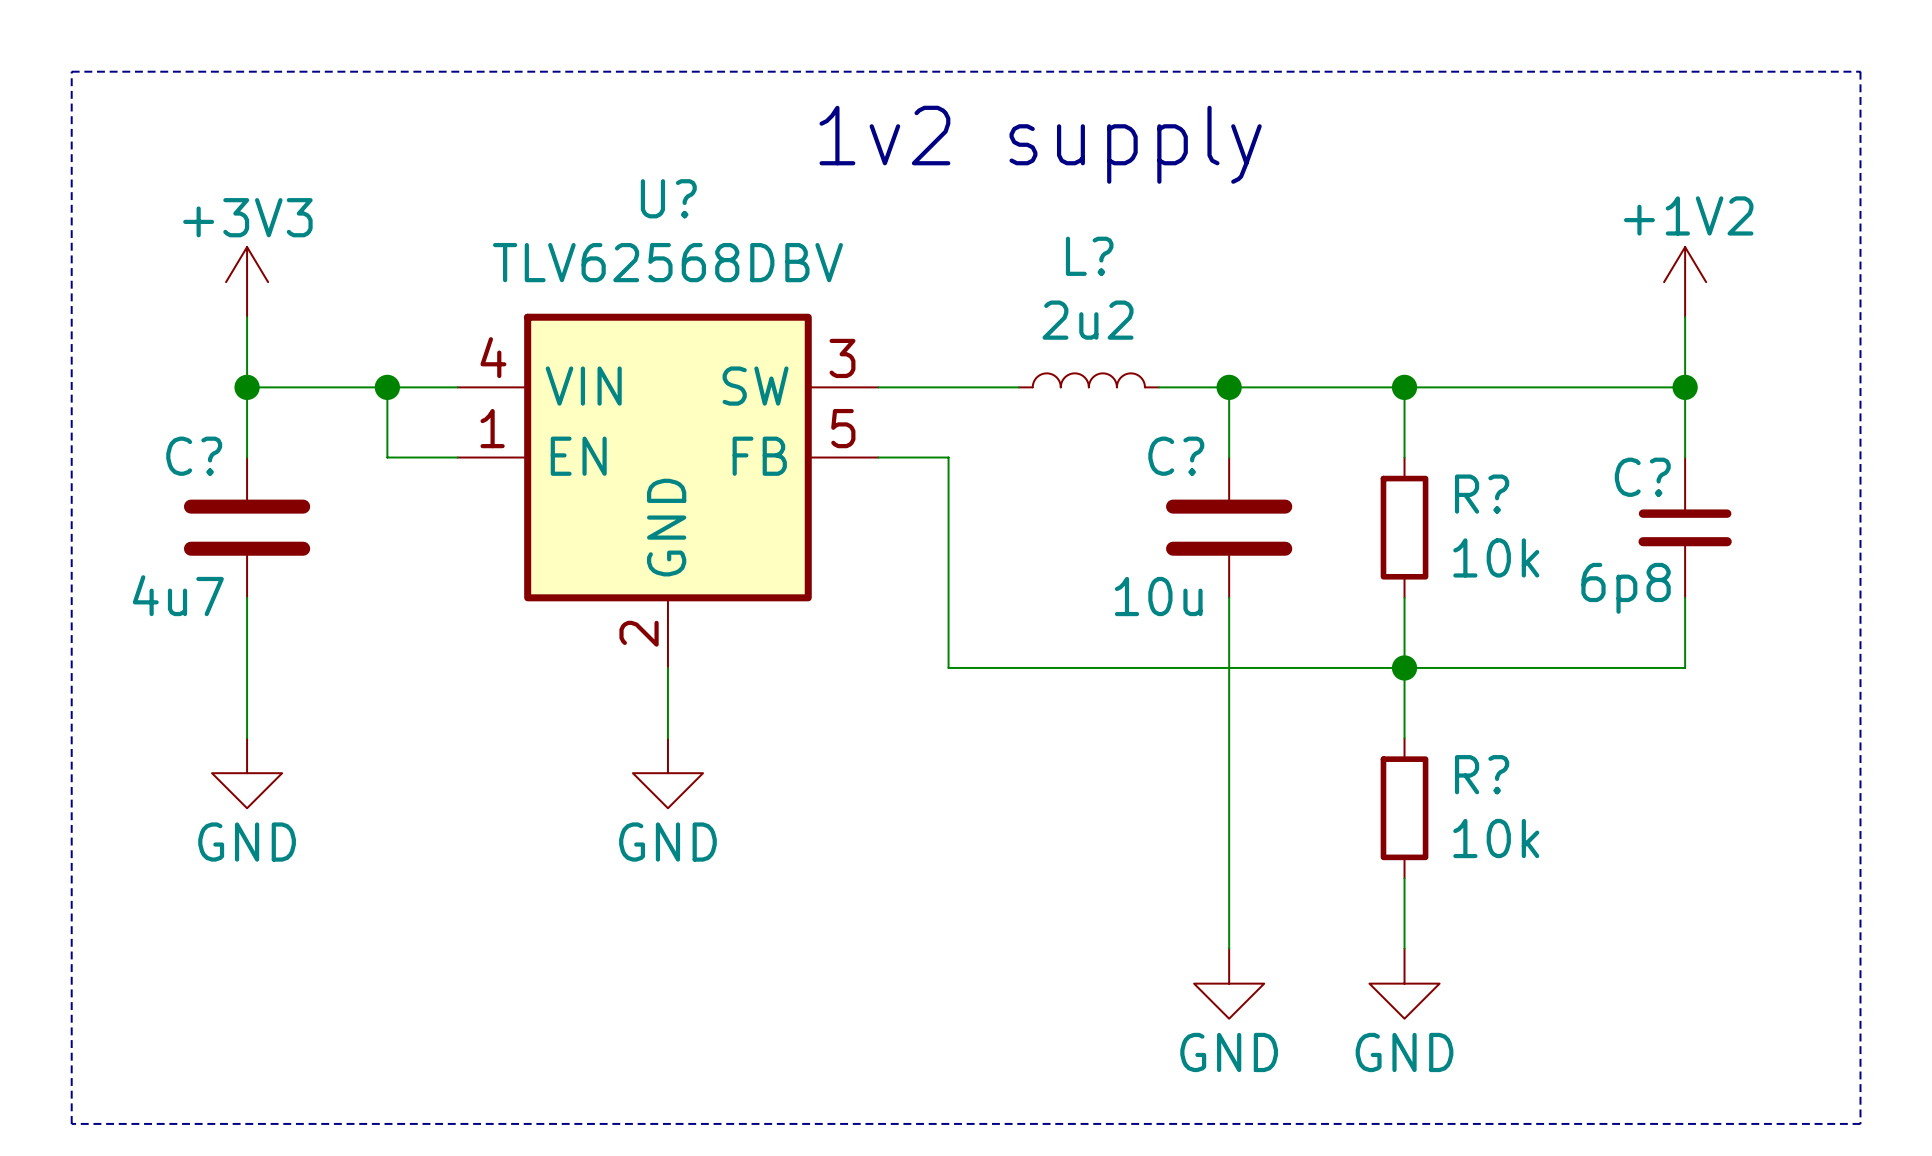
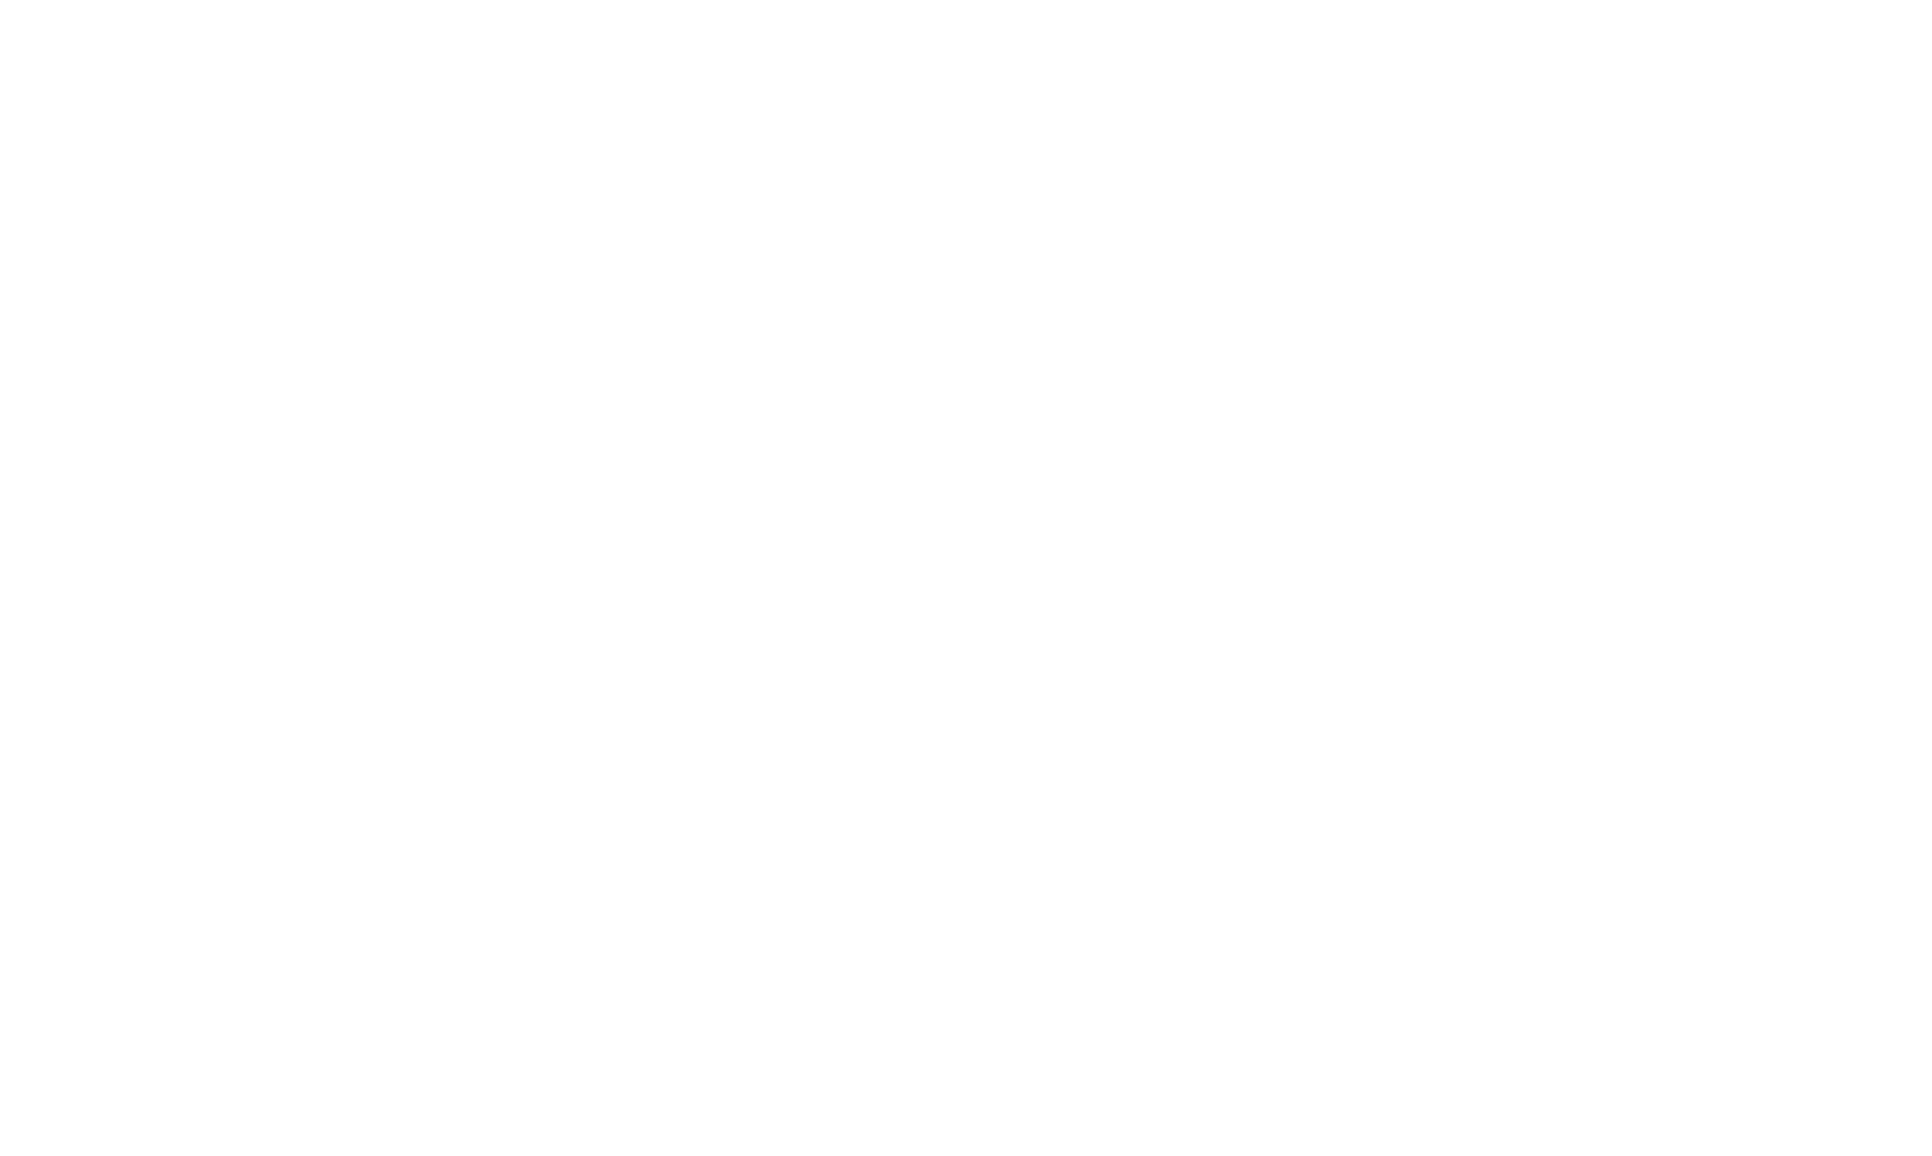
line: (71, 71) (1860, 71) (1860, 1123) (71, 1123) (71, 71) -> none
text: 1v2 supply (1040, 144) -> none
power symbol: +3V3 (247, 282) -> none
power symbol: +1V2 (1685, 282) -> none
wire: (247, 317) (247, 457) -> none
wire: (1685, 317) (1685, 457) -> none
L?: 2u2 (1088, 380) -> none
wire: (247, 387) (457, 387) -> none
junction: (247, 387) -> none
wire: (387, 387) (387, 457) (457, 457) -> none
junction: (387, 387) -> none
wire: (878, 387) (1018, 387) -> none
wire: (1159, 387) (1685, 387) -> none
wire: (1229, 387) (1229, 457) -> none
junction: (1229, 387) -> none
wire: (1404, 387) (1404, 457) -> none
junction: (1404, 387) -> none
junction: (1685, 387) -> none
wire: (878, 457) (948, 457) (948, 667) (1685, 667) (1685, 597) -> none
U?: TLV62568DBV (667, 490) -> none
C?: 4u7 (247, 527) -> none
C?: 10u (1229, 527) -> none
R?: 10k (1404, 527) -> none
C?: 6p8 (1685, 527) -> none
wire: (247, 597) (247, 738) -> none
wire: (1229, 597) (1229, 948) -> none
wire: (1404, 597) (1404, 738) -> none
wire: (667, 667) (667, 738) -> none
junction: (1404, 667) -> none
power symbol: GND (247, 773) -> none
power symbol: GND (667, 773) -> none
R?: 10k (1404, 808) -> none
wire: (1404, 878) (1404, 948) -> none
power symbol: GND (1229, 983) -> none
power symbol: GND (1404, 983) -> none

